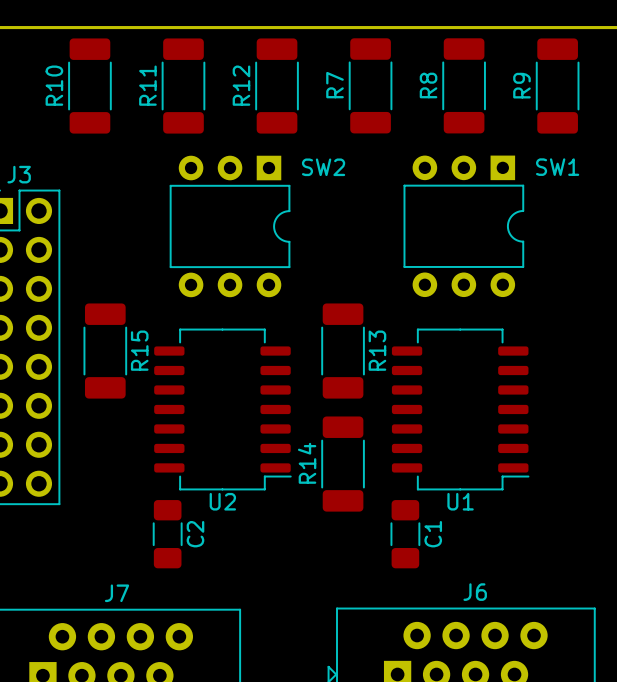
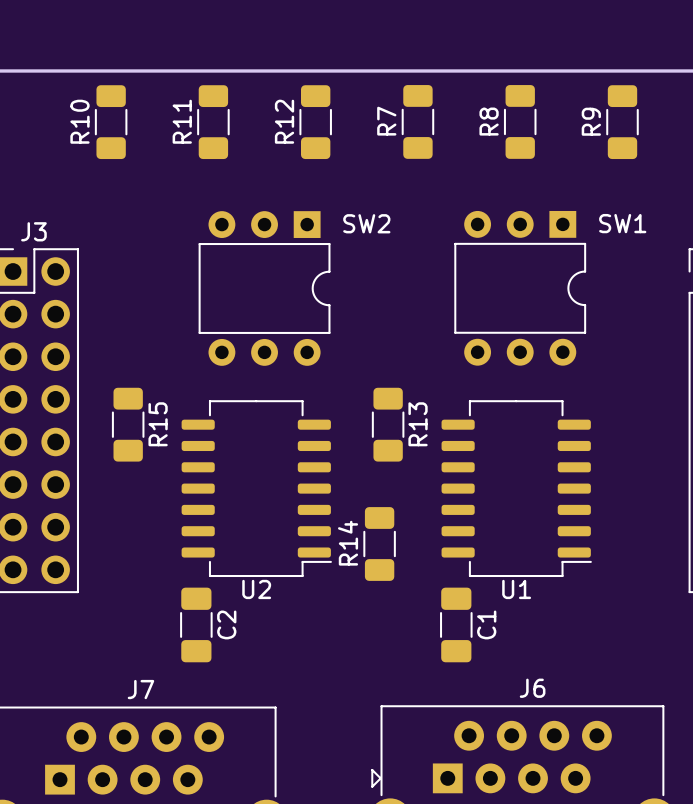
R10 footprint: [68, 38, 112, 134] -> [94, 85, 128, 160]
R11 footprint: [161, 38, 206, 134] -> [197, 85, 230, 160]
R12 footprint: [255, 38, 299, 134] -> [299, 85, 332, 160]
R7 footprint: [348, 38, 393, 134] -> [401, 85, 435, 159]
R8 footprint: [442, 38, 486, 134] -> [503, 85, 537, 159]
R9 footprint: [535, 38, 580, 134] -> [606, 85, 639, 160]
R15 footprint: [83, 303, 128, 399] -> [111, 387, 145, 462]
R13 footprint: [321, 303, 365, 399] -> [371, 387, 405, 462]
R14 footprint: [321, 416, 365, 512] -> [363, 507, 396, 581]

